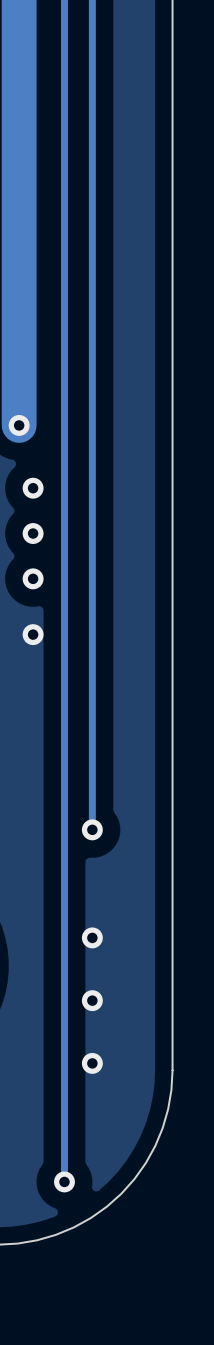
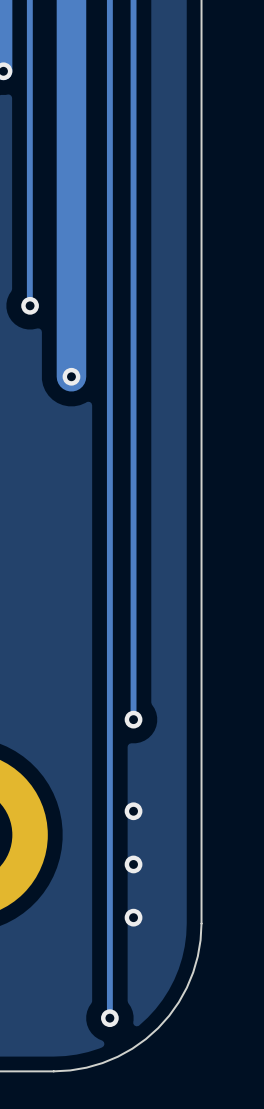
via: (33, 488) -> none
via: (33, 533) -> none
via: (33, 578) -> none
via: (33, 634) -> none

